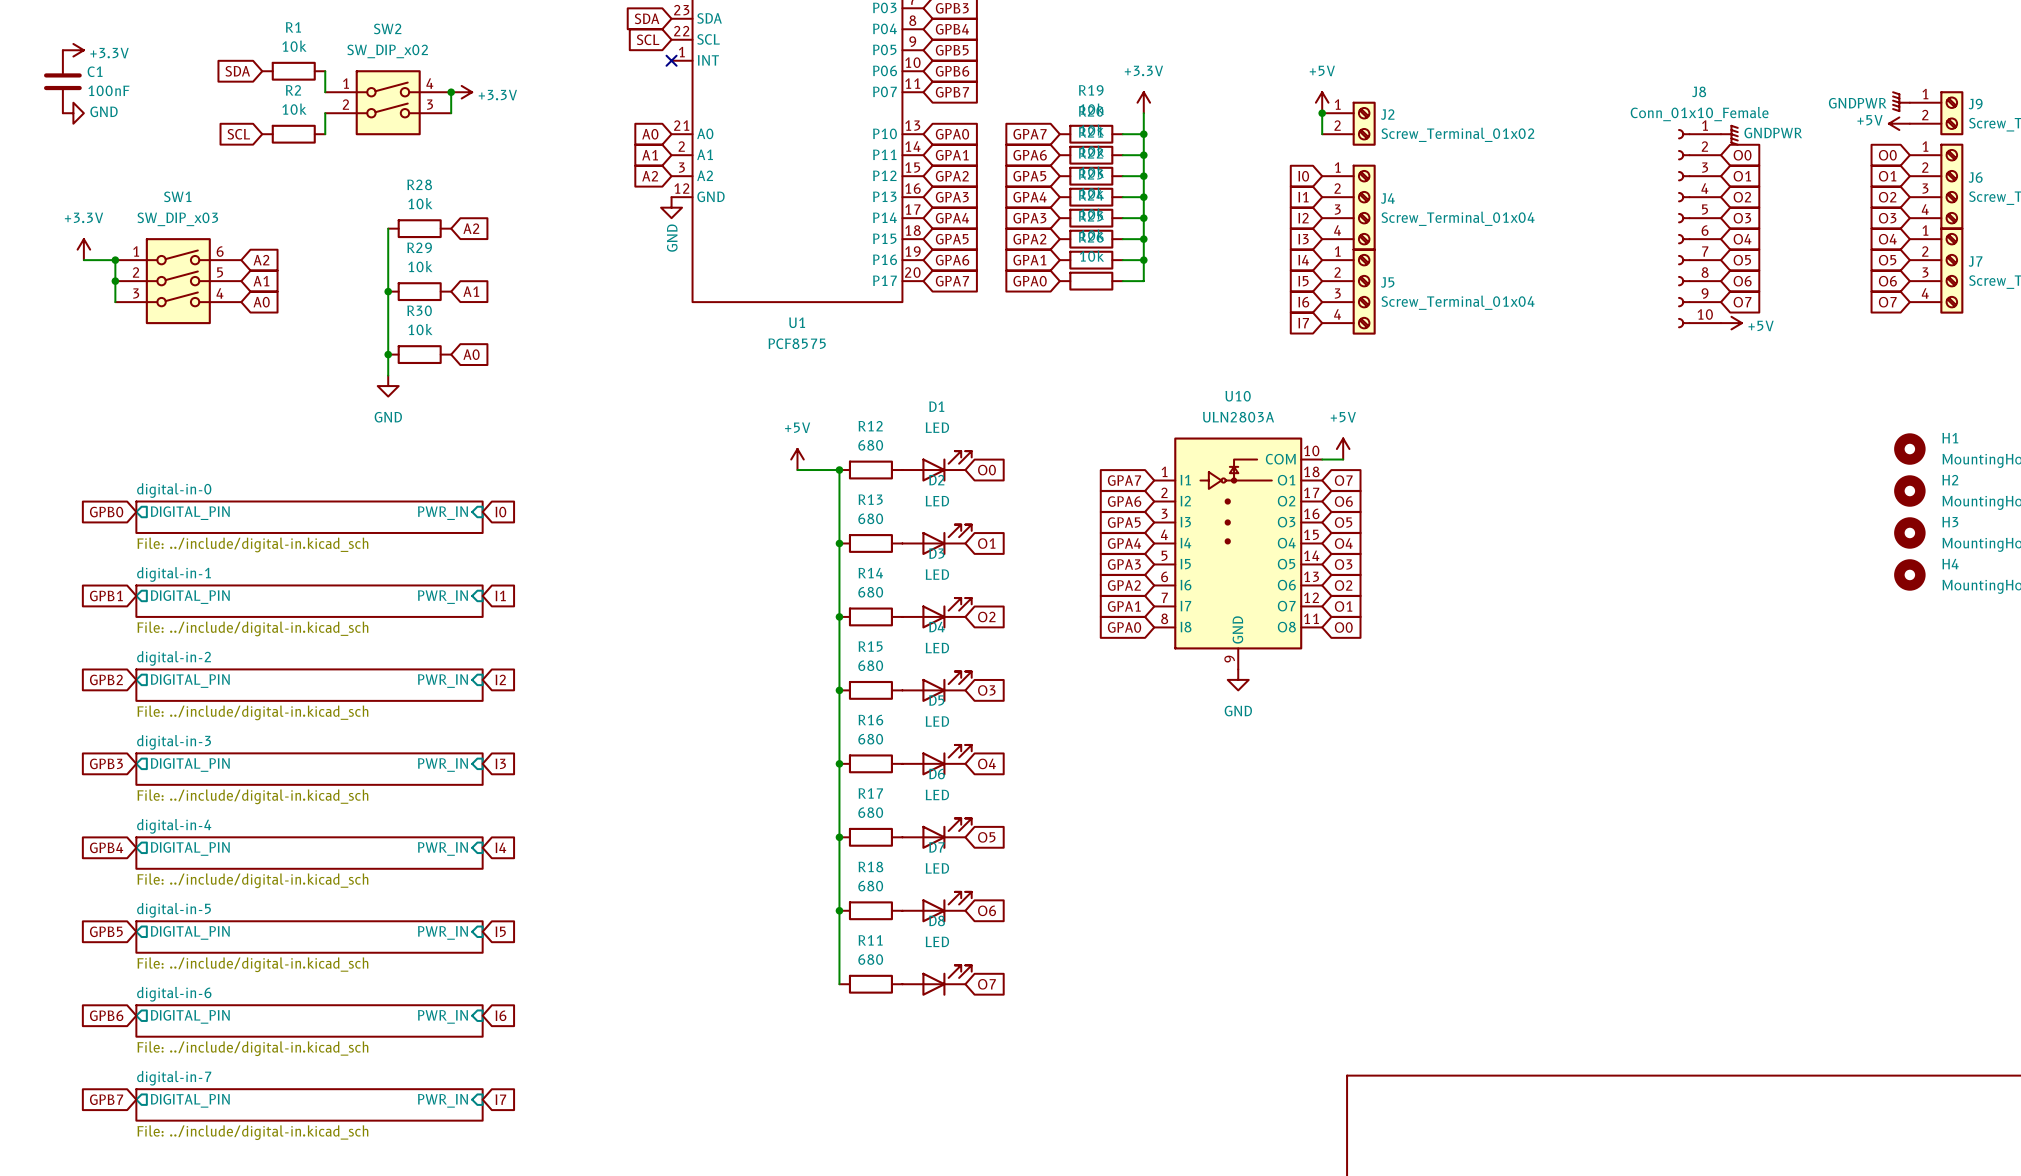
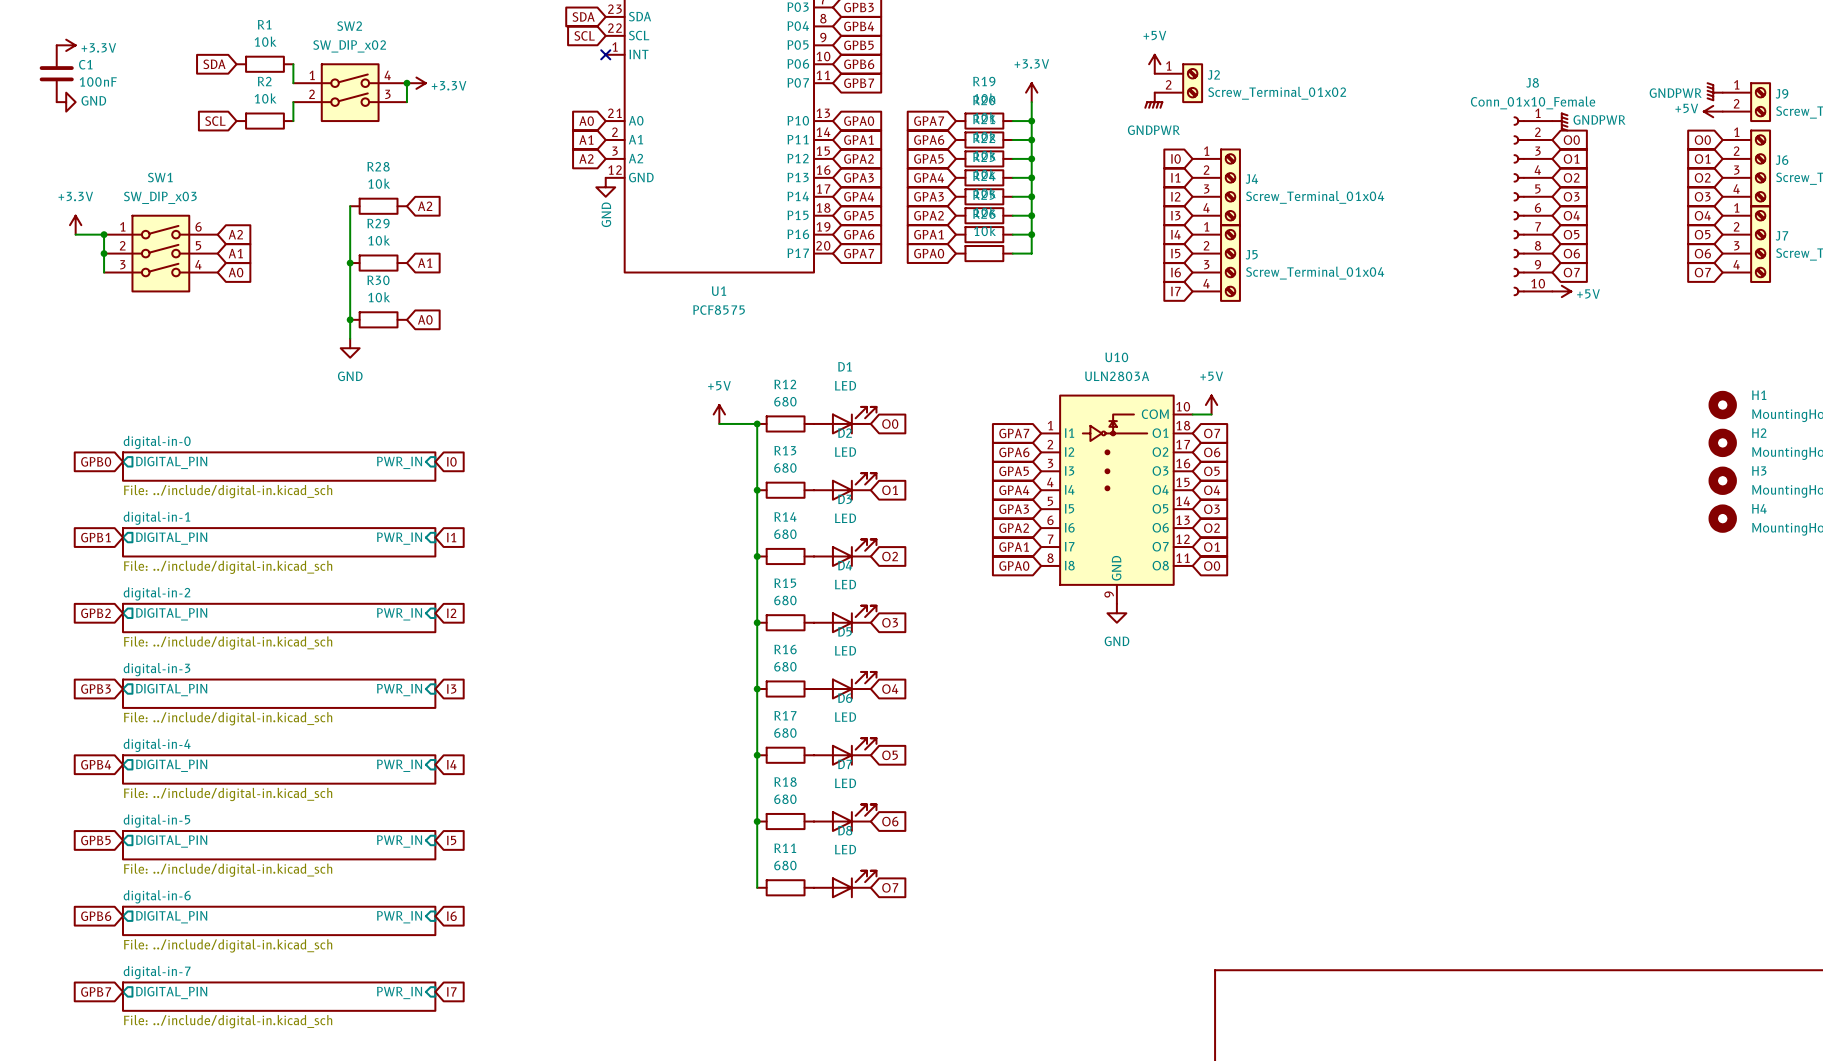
power symbol position: +5V (1322, 102) -> +5V (1154, 64)
power symbol: none -> GNDPWR (1153, 100)
wire: (1322, 113) (1322, 134) -> none
junction: (1322, 113) -> none
J2 position: (1348, 123) -> (1178, 83)

